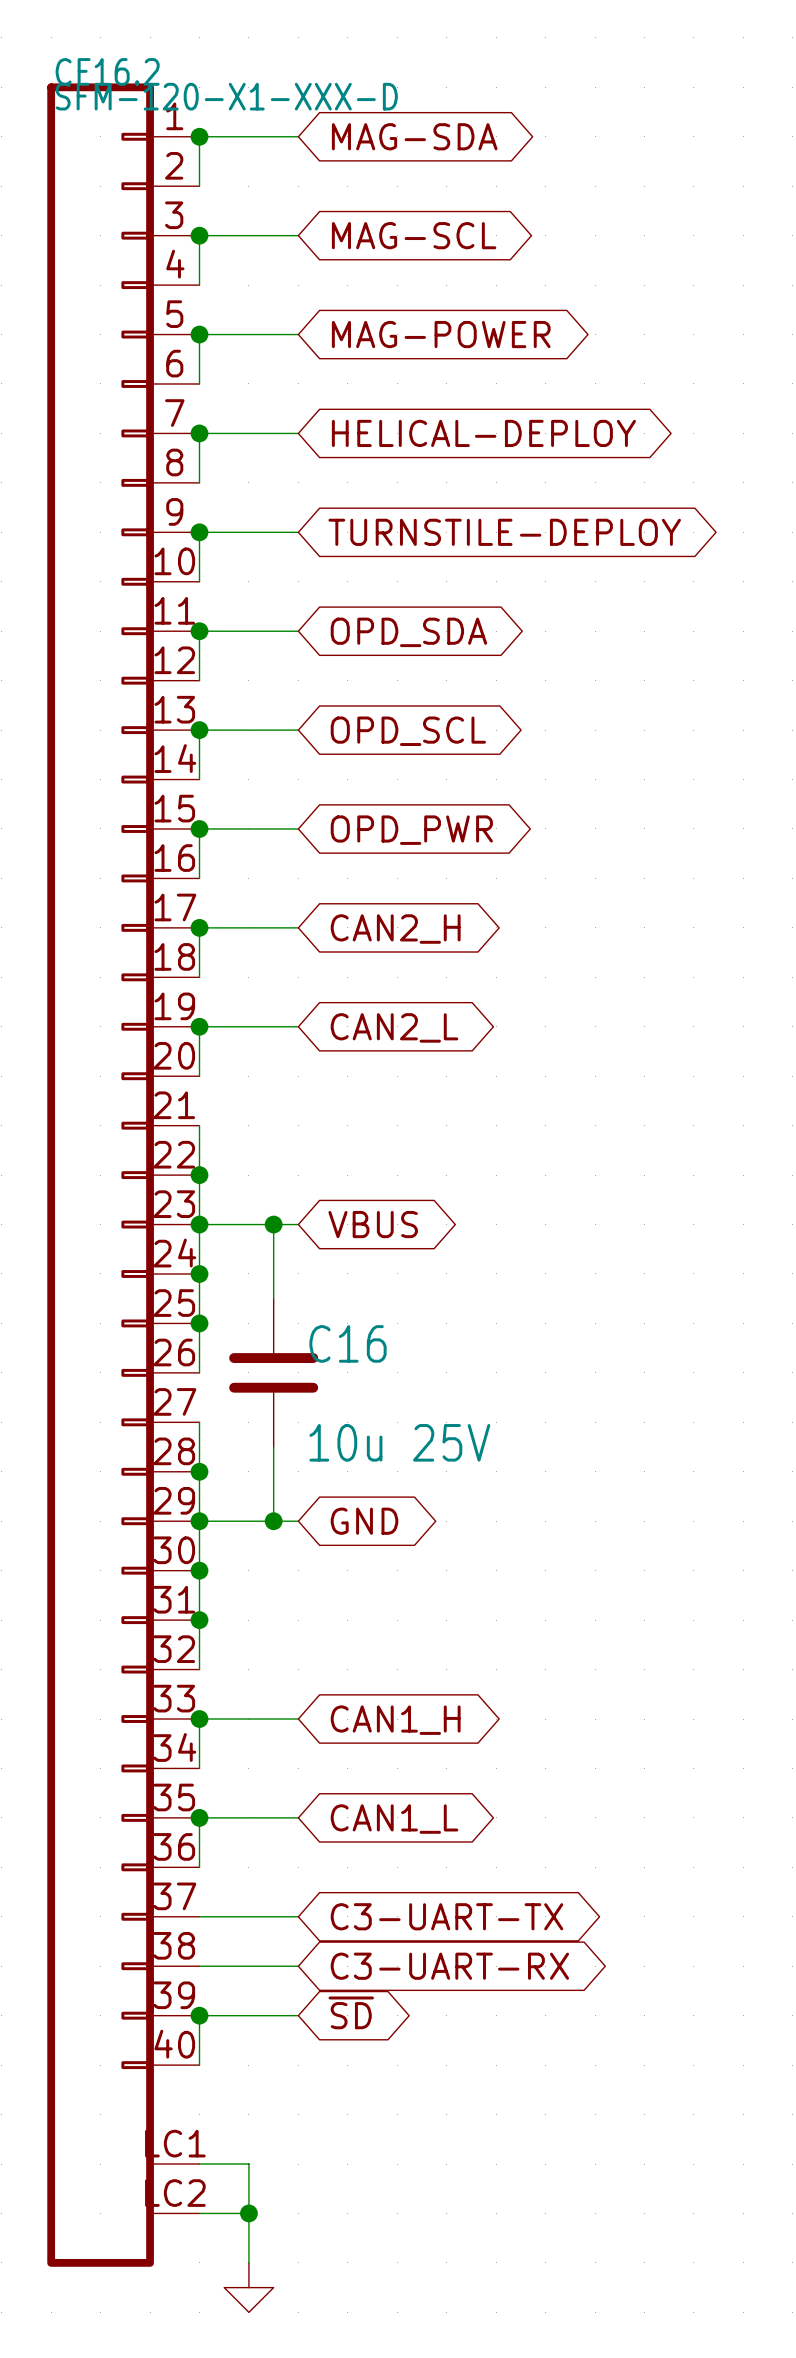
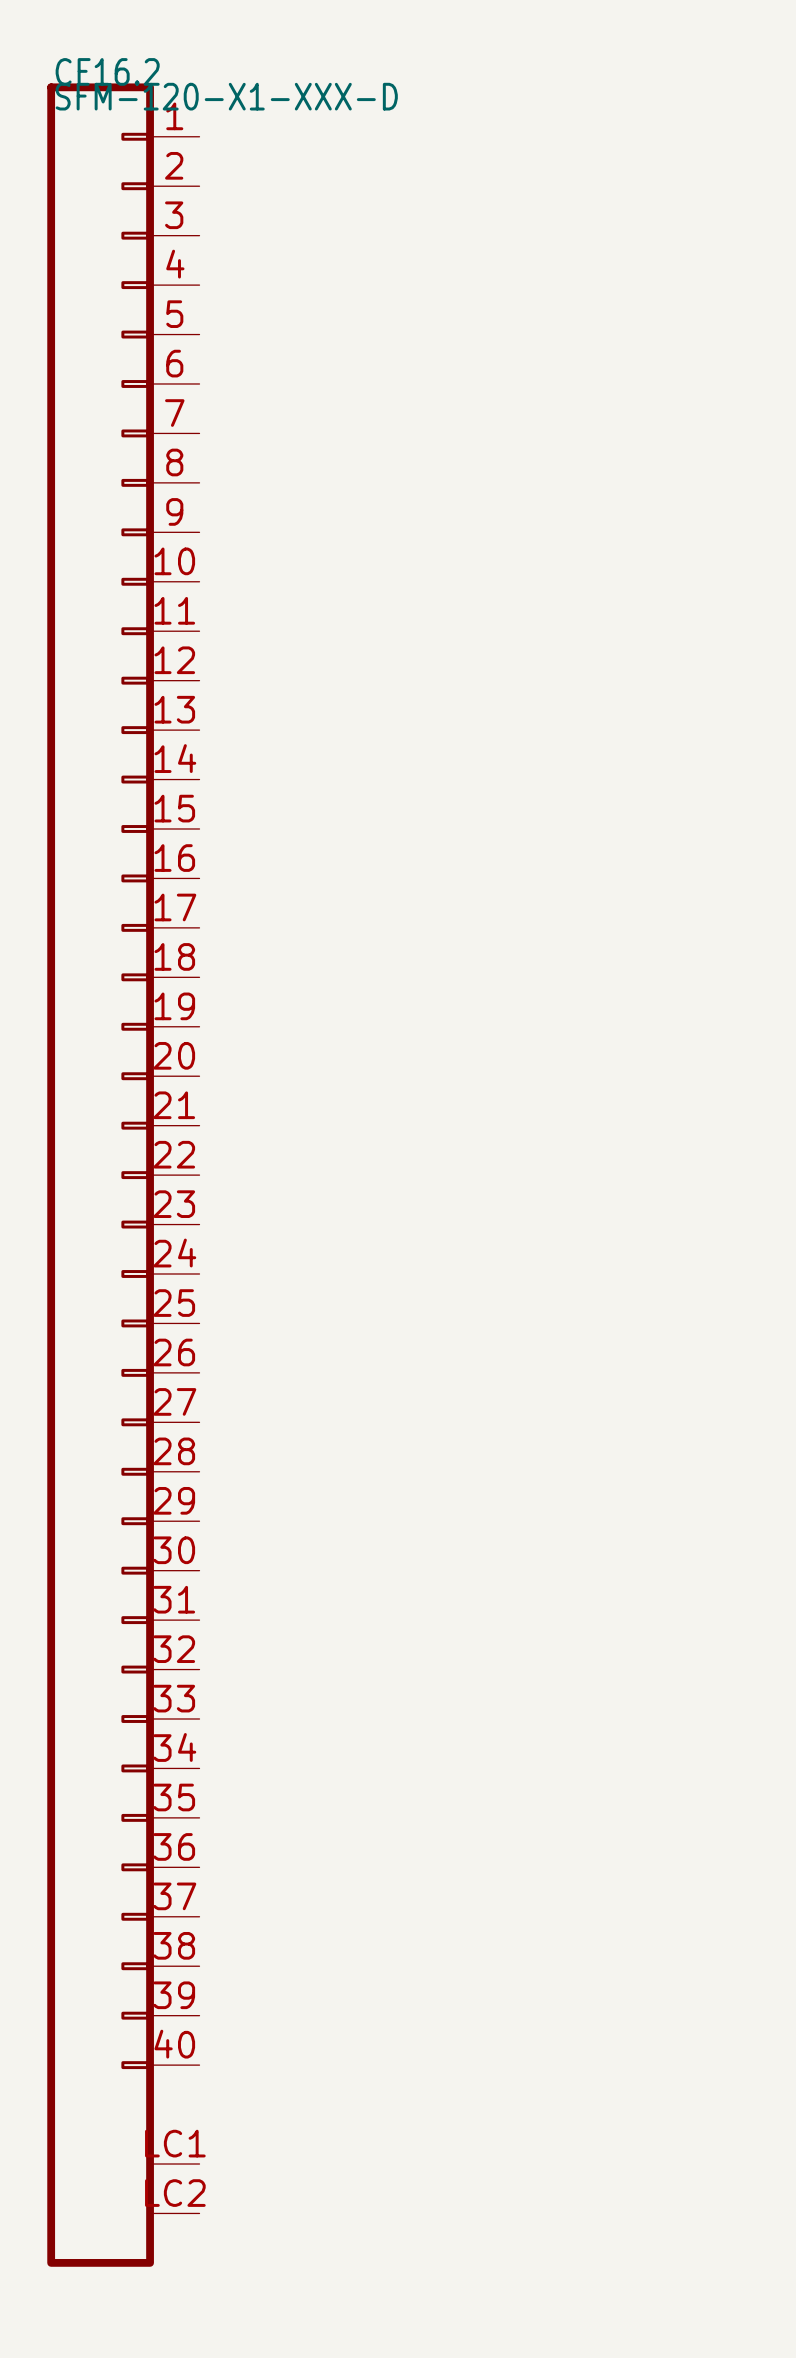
junction: (199, 136) -> none
wire: (298, 136) (199, 136) (199, 186) -> none
global label: MAG-SDA (414, 136) -> none
junction: (199, 235) -> none
wire: (298, 235) (199, 235) (199, 285) -> none
global label: MAG-SCL (414, 235) -> none
junction: (199, 334) -> none
wire: (298, 334) (199, 334) (199, 383) -> none
global label: MAG-POWER (441, 334) -> none
junction: (199, 433) -> none
wire: (298, 433) (199, 433) (199, 482) -> none
global label: HELICAL-DEPLOY (483, 433) -> none
junction: (199, 532) -> none
wire: (298, 532) (199, 532) (199, 581) -> none
global label: TURNSTILE-DEPLOY (504, 532) -> none
junction: (199, 631) -> none
wire: (298, 631) (199, 631) (199, 680) -> none
global label: OPD_SDA (408, 632) -> none
junction: (199, 730) -> none
wire: (298, 730) (199, 730) (199, 779) -> none
global label: OPD_SCL (408, 731) -> none
junction: (199, 828) -> none
wire: (298, 828) (199, 828) (199, 878) -> none
global label: OPD_PWR (411, 830) -> none
junction: (199, 927) -> none
wire: (298, 927) (199, 927) (199, 977) -> none
global label: CAN2_H (395, 929) -> none
junction: (199, 1026) -> none
wire: (298, 1026) (199, 1026) (199, 1076) -> none
global label: CAN2_L (394, 1027) -> none
wire: (199, 1125) (199, 1372) -> none
junction: (199, 1175) -> none
wire: (199, 1224) (298, 1224) -> none
junction: (199, 1224) -> none
wire: (273, 1224) (273, 1298) -> none
junction: (273, 1224) -> none
global label: VBUS (373, 1224) -> none
junction: (199, 1273) -> none
junction: (199, 1323) -> none
C16: 10u 25V (273, 1372) -> none
wire: (199, 1422) (199, 1669) -> none
wire: (273, 1447) (273, 1521) -> none
junction: (199, 1471) -> none
wire: (199, 1521) (298, 1521) -> none
junction: (199, 1521) -> none
junction: (273, 1521) -> none
global label: GND (364, 1521) -> none
junction: (199, 1570) -> none
junction: (199, 1620) -> none
junction: (199, 1719) -> none
wire: (298, 1719) (199, 1719) (199, 1768) -> none
global label: CAN1_H (395, 1720) -> none
junction: (199, 1817) -> none
wire: (298, 1817) (199, 1817) (199, 1867) -> none
global label: CAN1_L (394, 1819) -> none
wire: (199, 1916) (298, 1916) -> none
global label: C3-UART-TX (447, 1916) -> none
wire: (199, 1966) (298, 1966) -> none
global label: C3-UART-RX (449, 1966) -> none
global label: ~{SD} (351, 2012) -> none
junction: (199, 2015) -> none
wire: (298, 2015) (199, 2015) (199, 2065) -> none
wire: (199, 2164) (248, 2164) (248, 2262) -> none
wire: (199, 2213) (248, 2213) -> none
junction: (248, 2213) -> none
power symbol: (248, 2287) -> none

